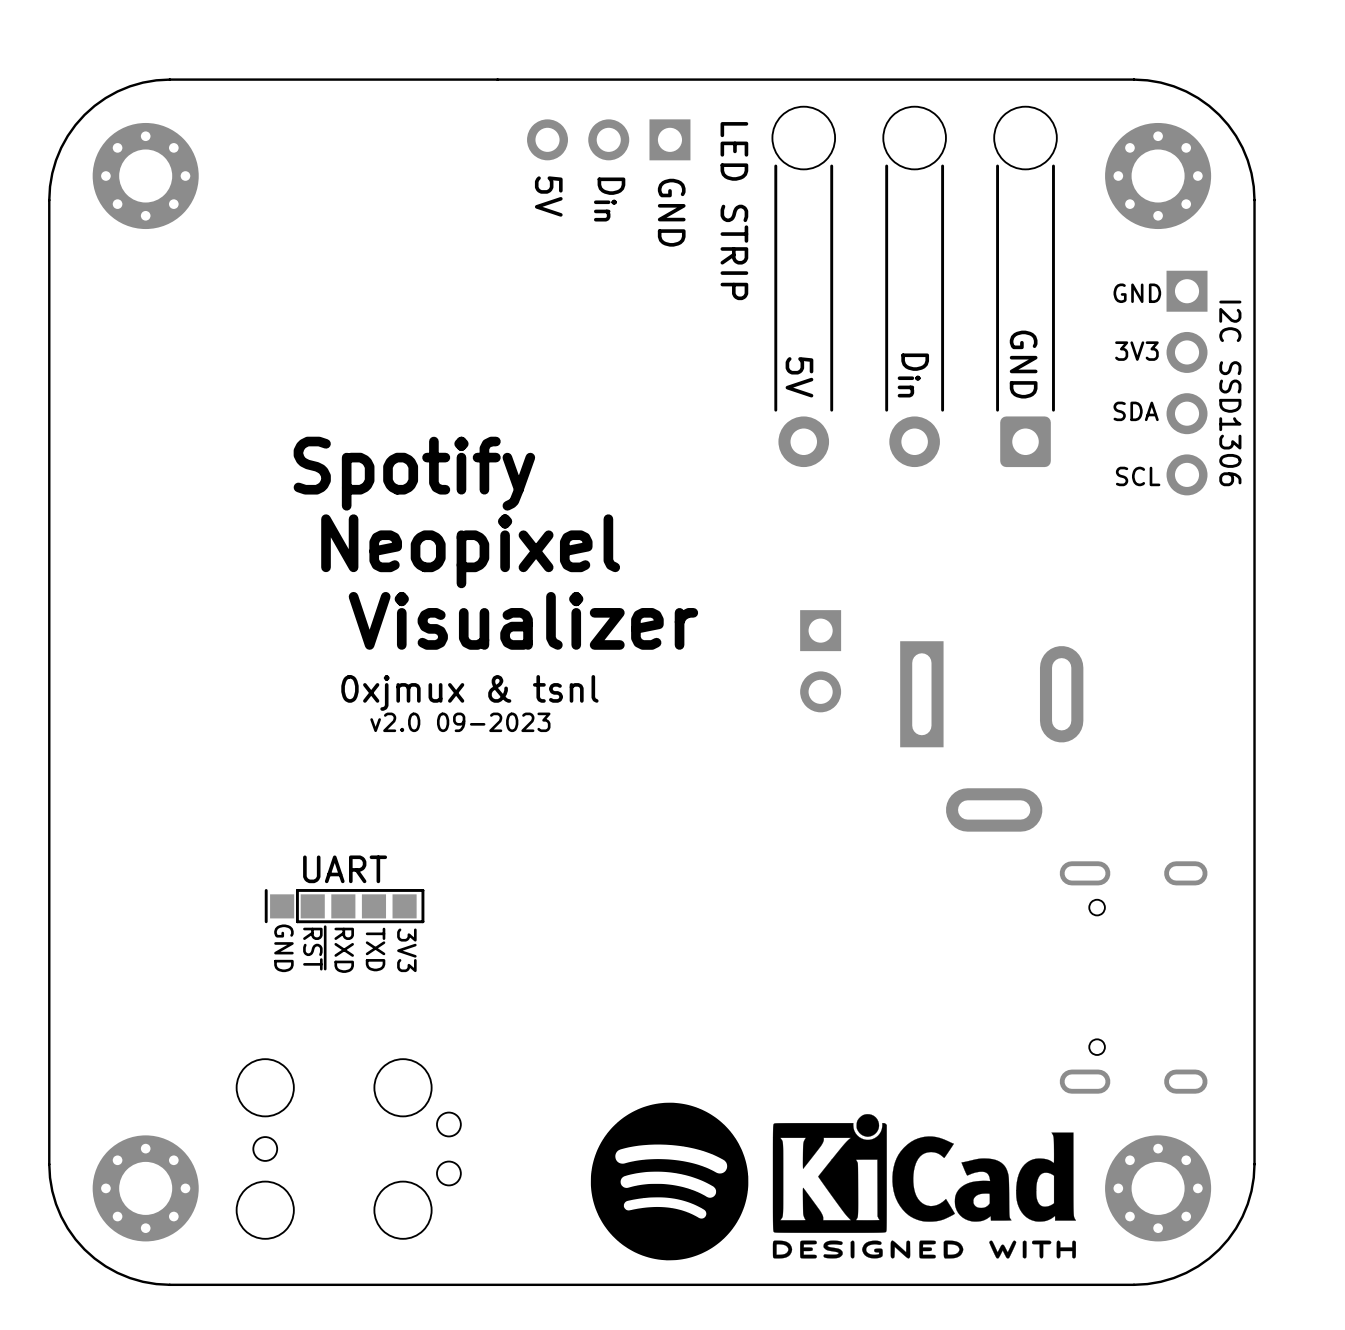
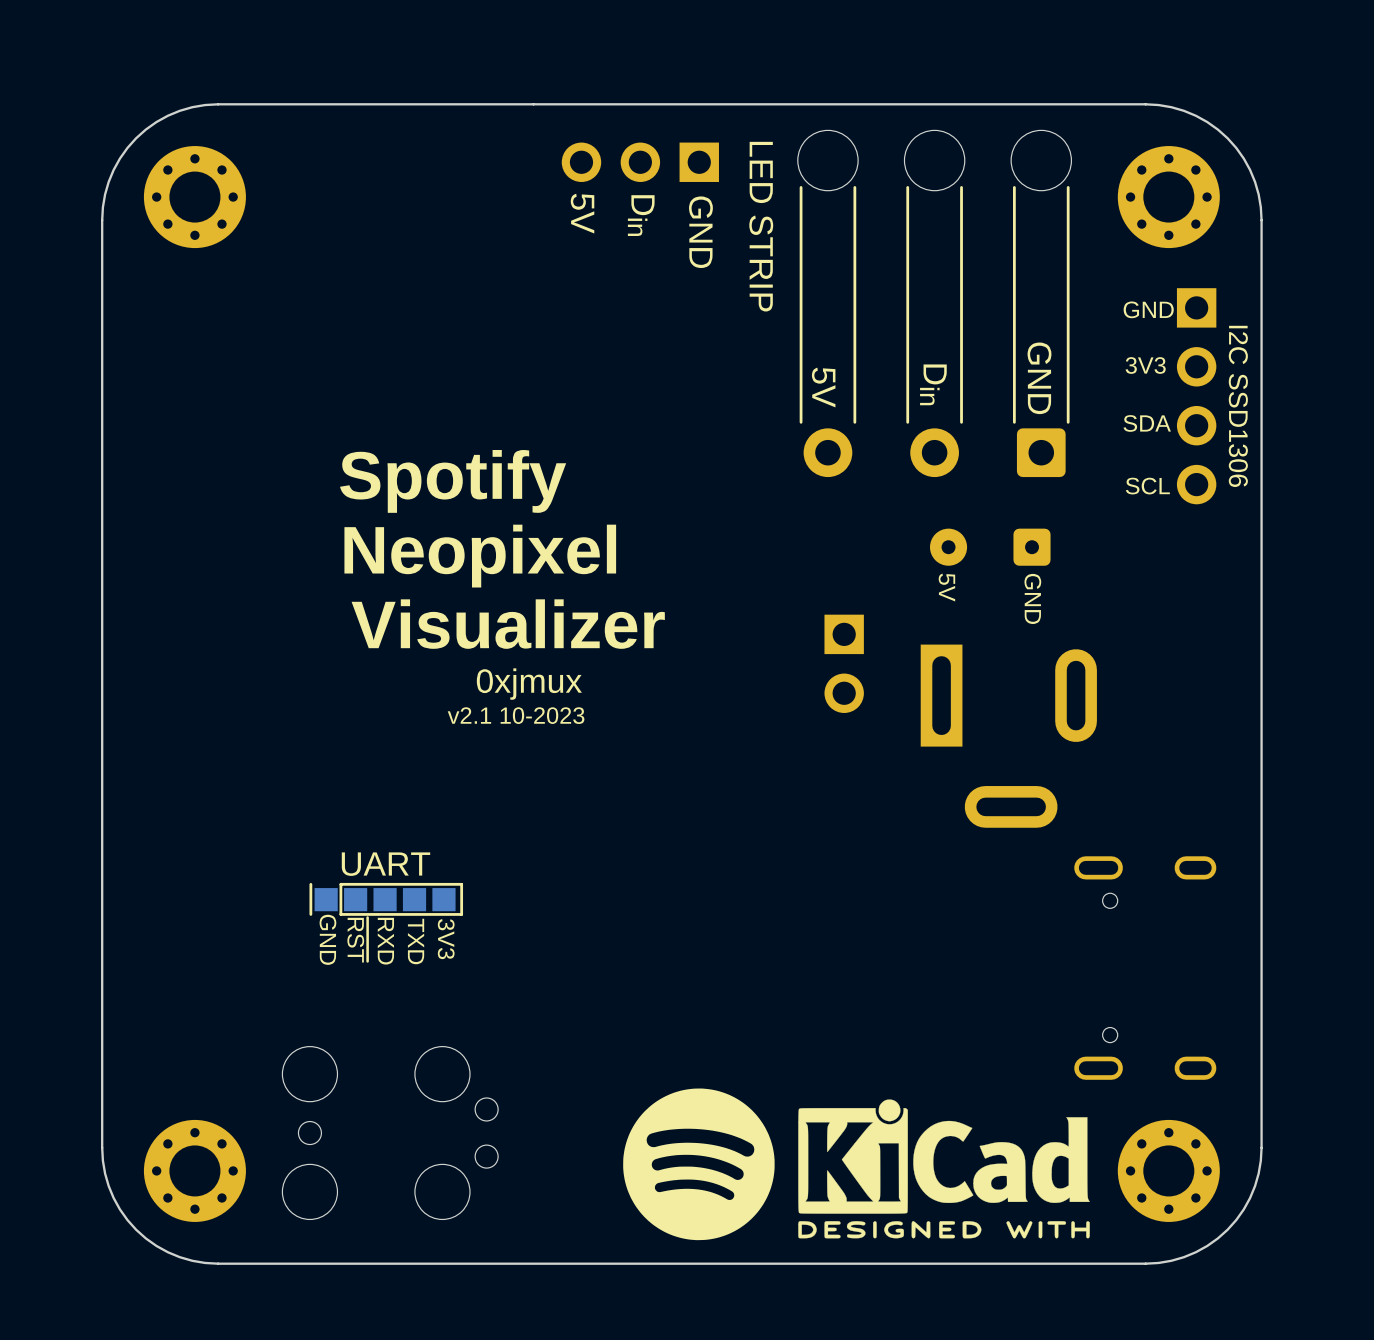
part: none -> (990, 547)
text: none -> 5V (946, 587)
text: none -> GND (1032, 598)
text: 0xjmux & tsnl (469, 692) -> 0xjmux (529, 684)
text: v2.0 09-2023 (460, 722) -> v2.1 10-2023 (516, 715)

